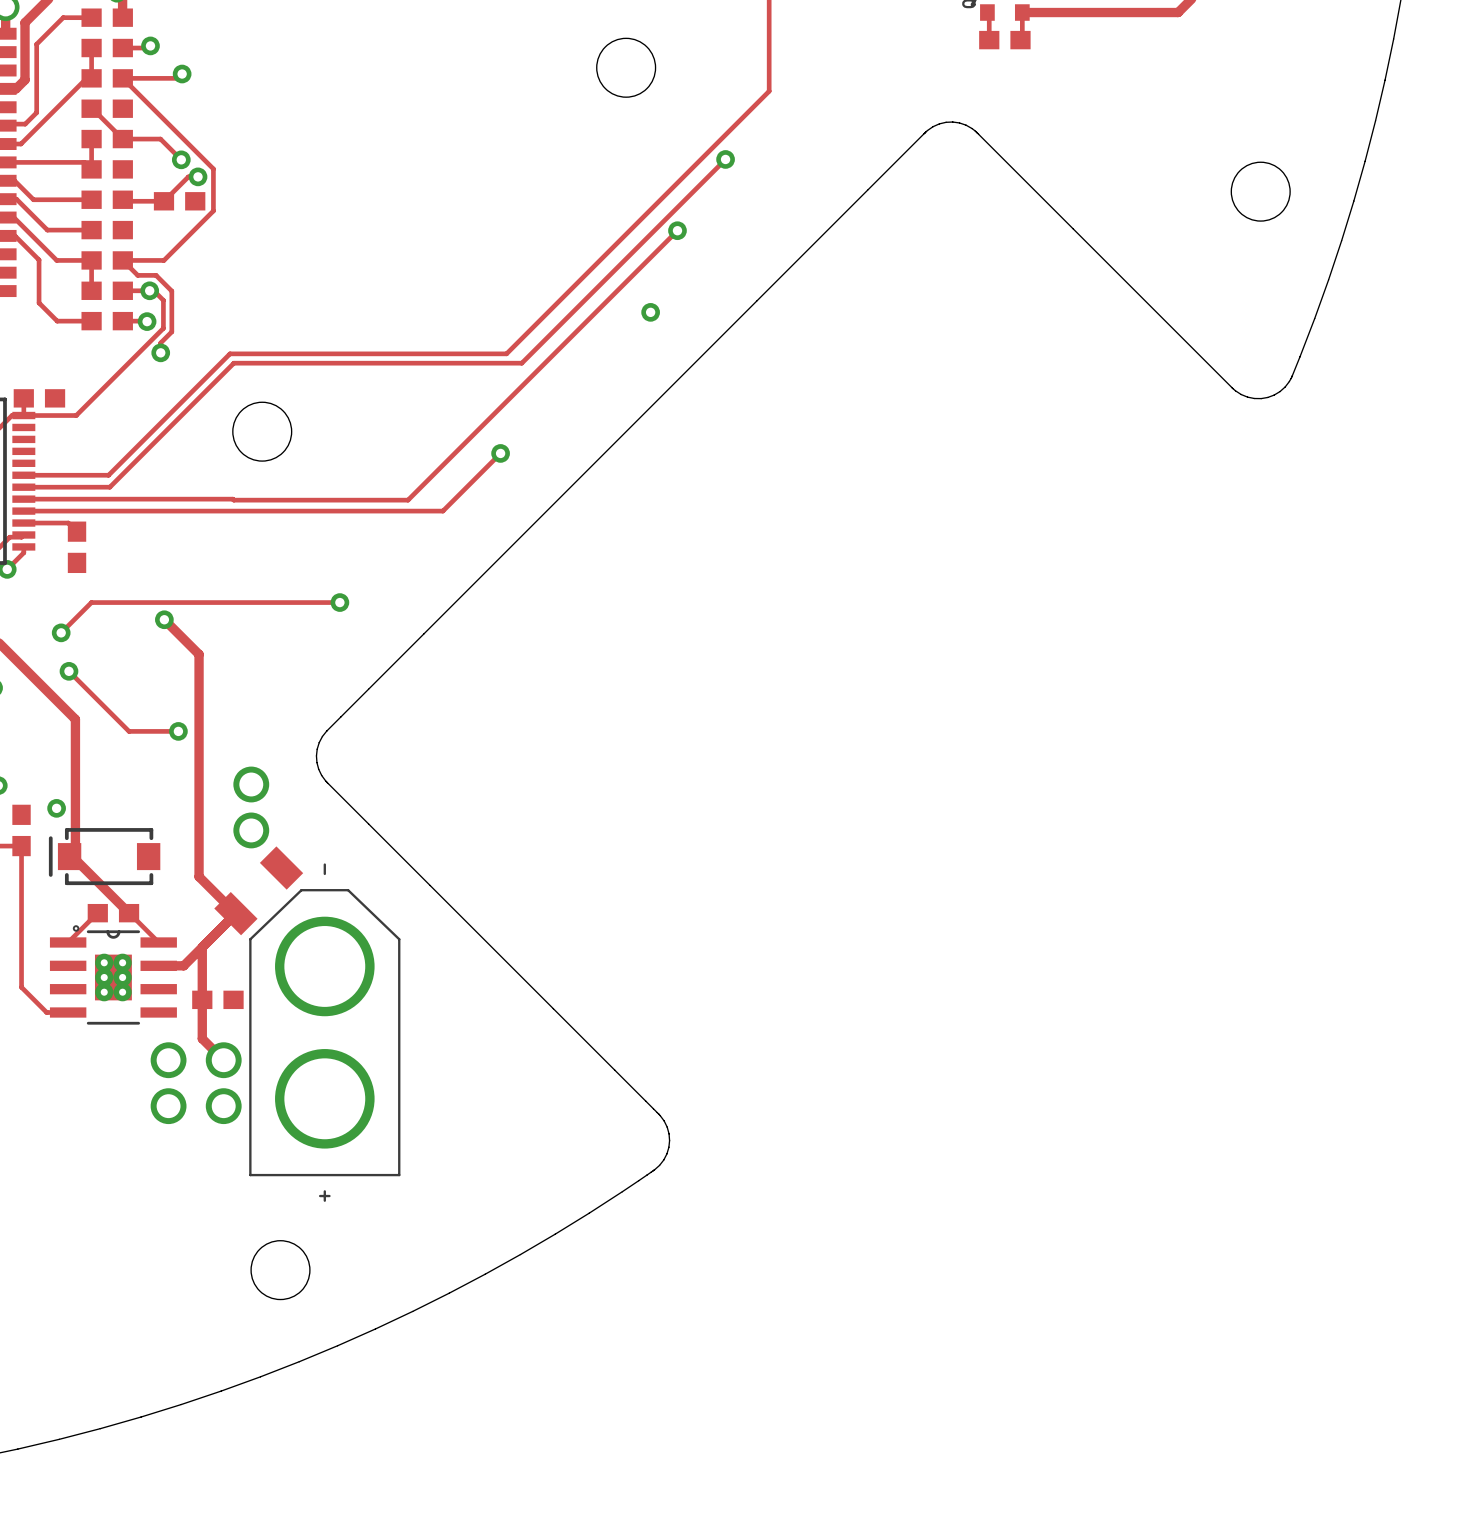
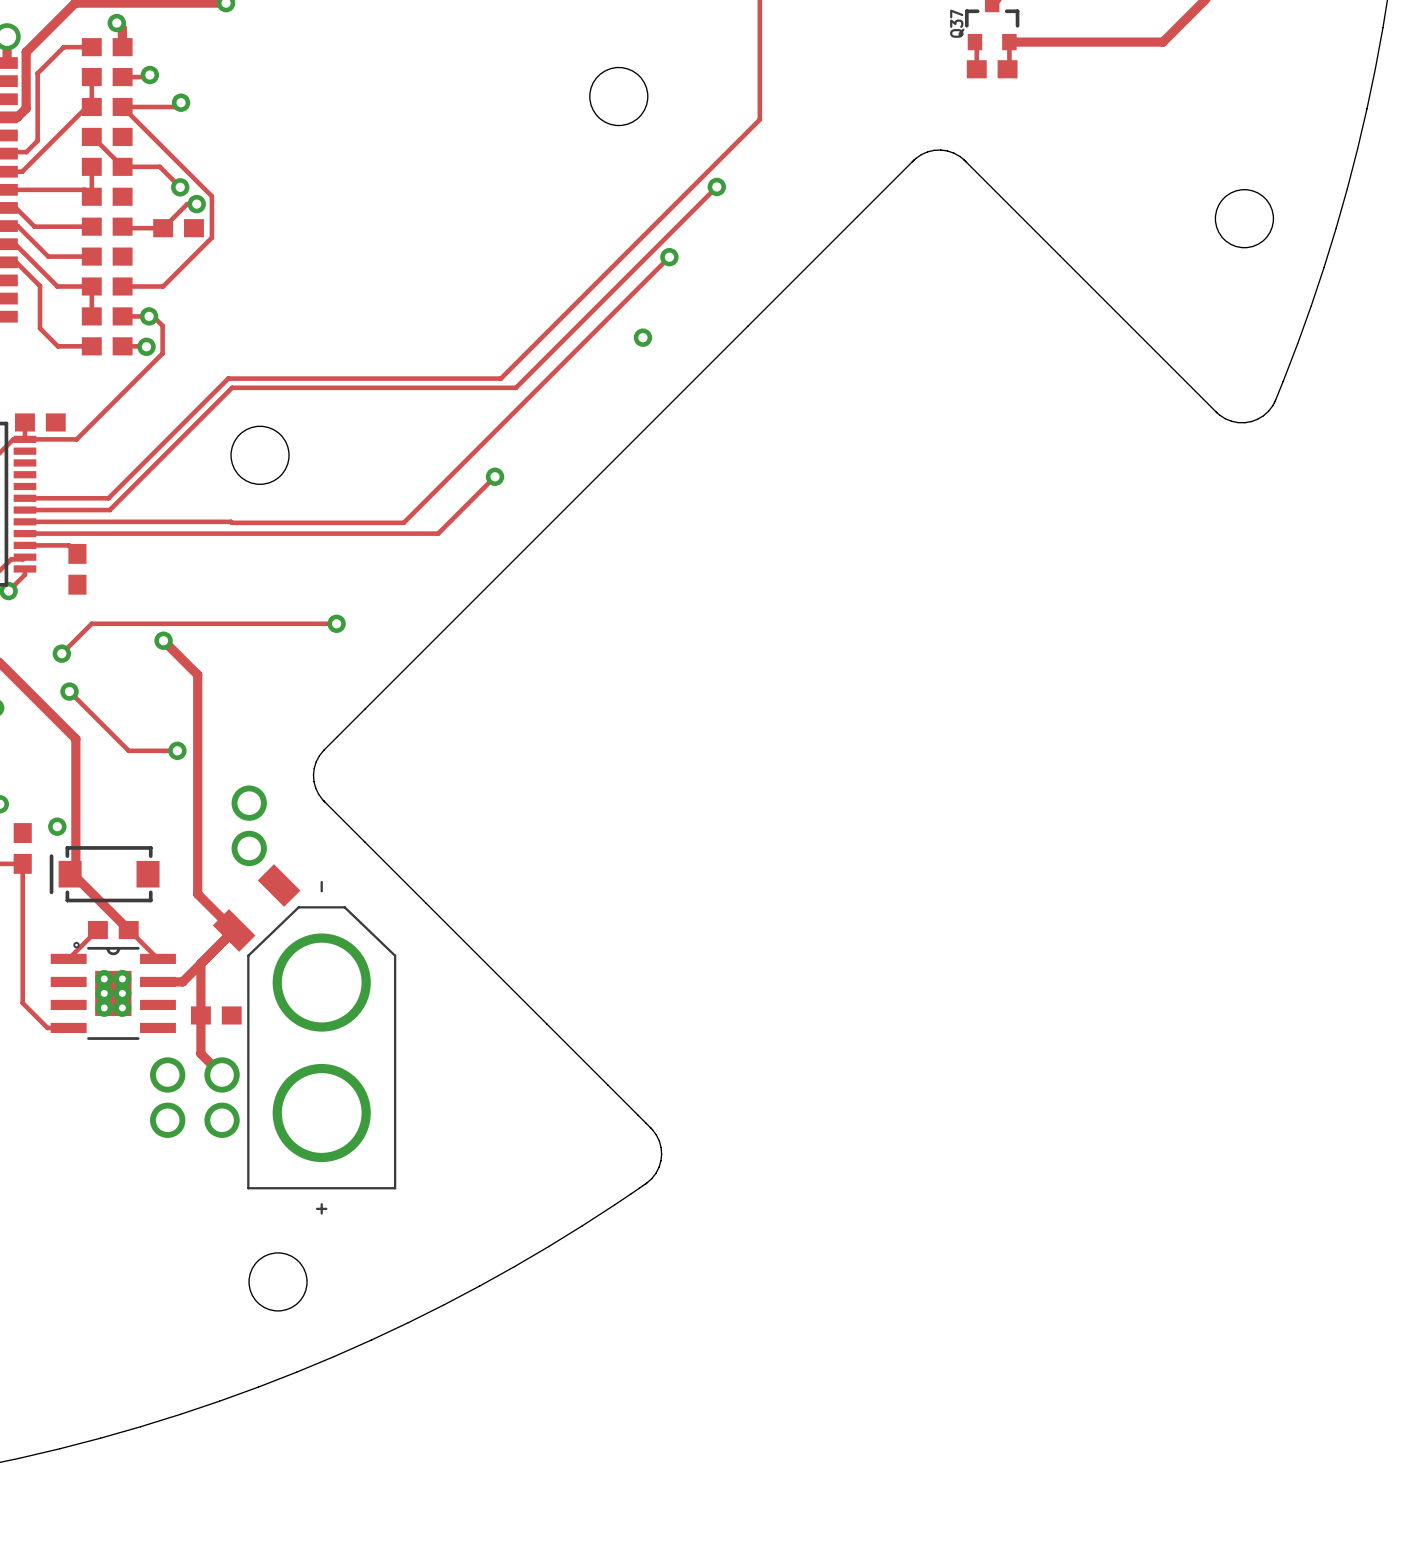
track: (122, 260) (137, 275) (156, 275) (171, 291) (171, 331) (160, 342) (160, 352) -> none
via: (160, 352) -> none

